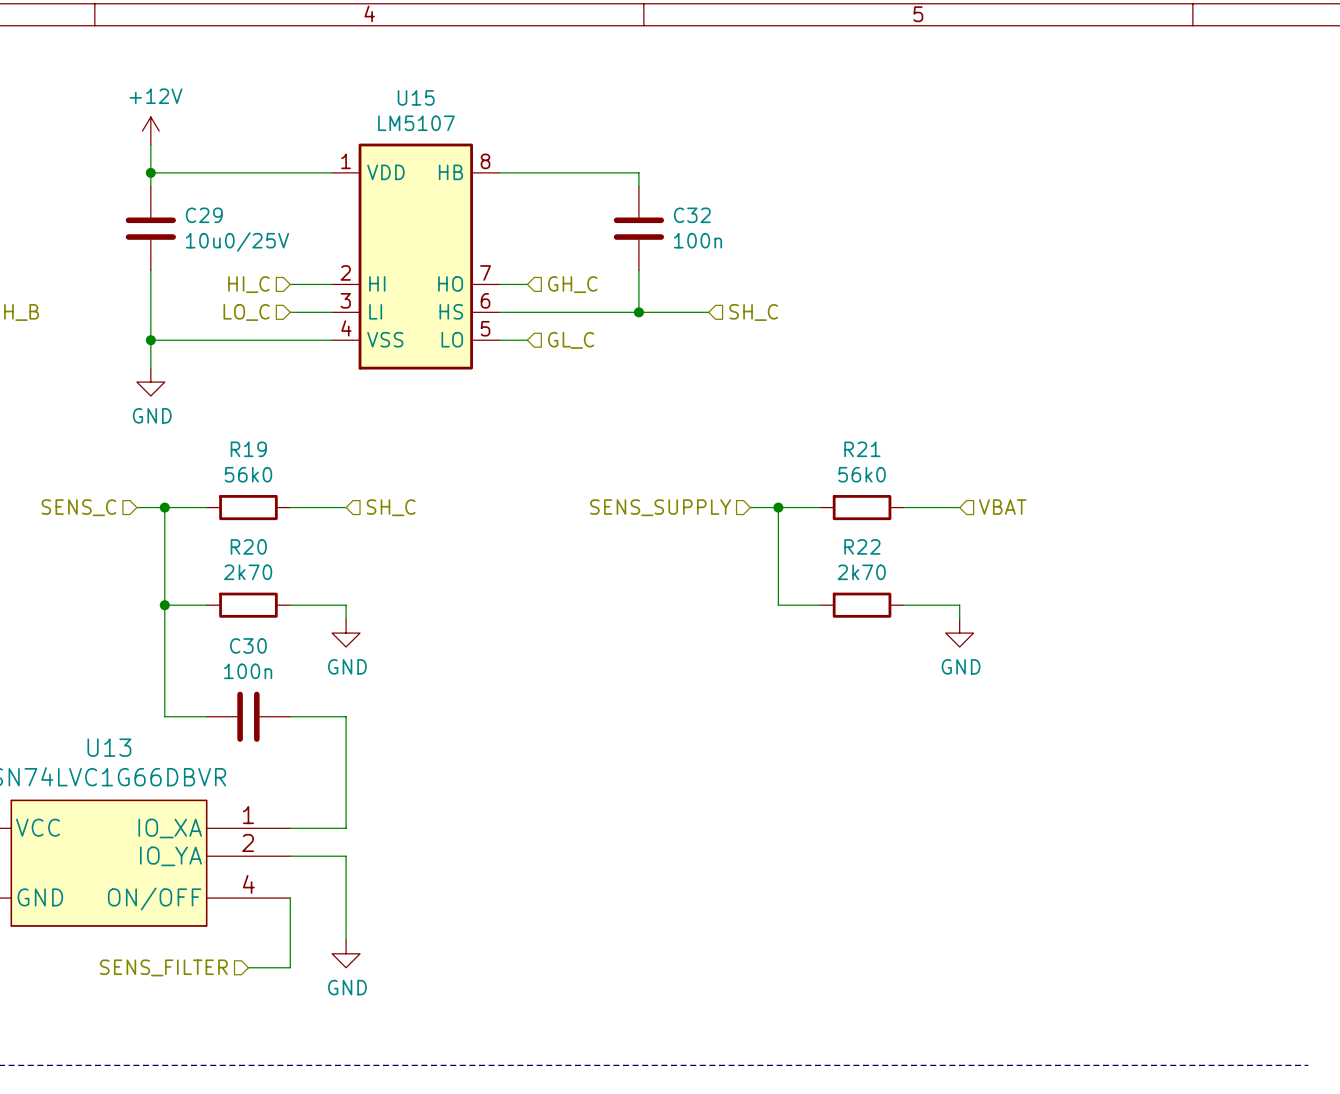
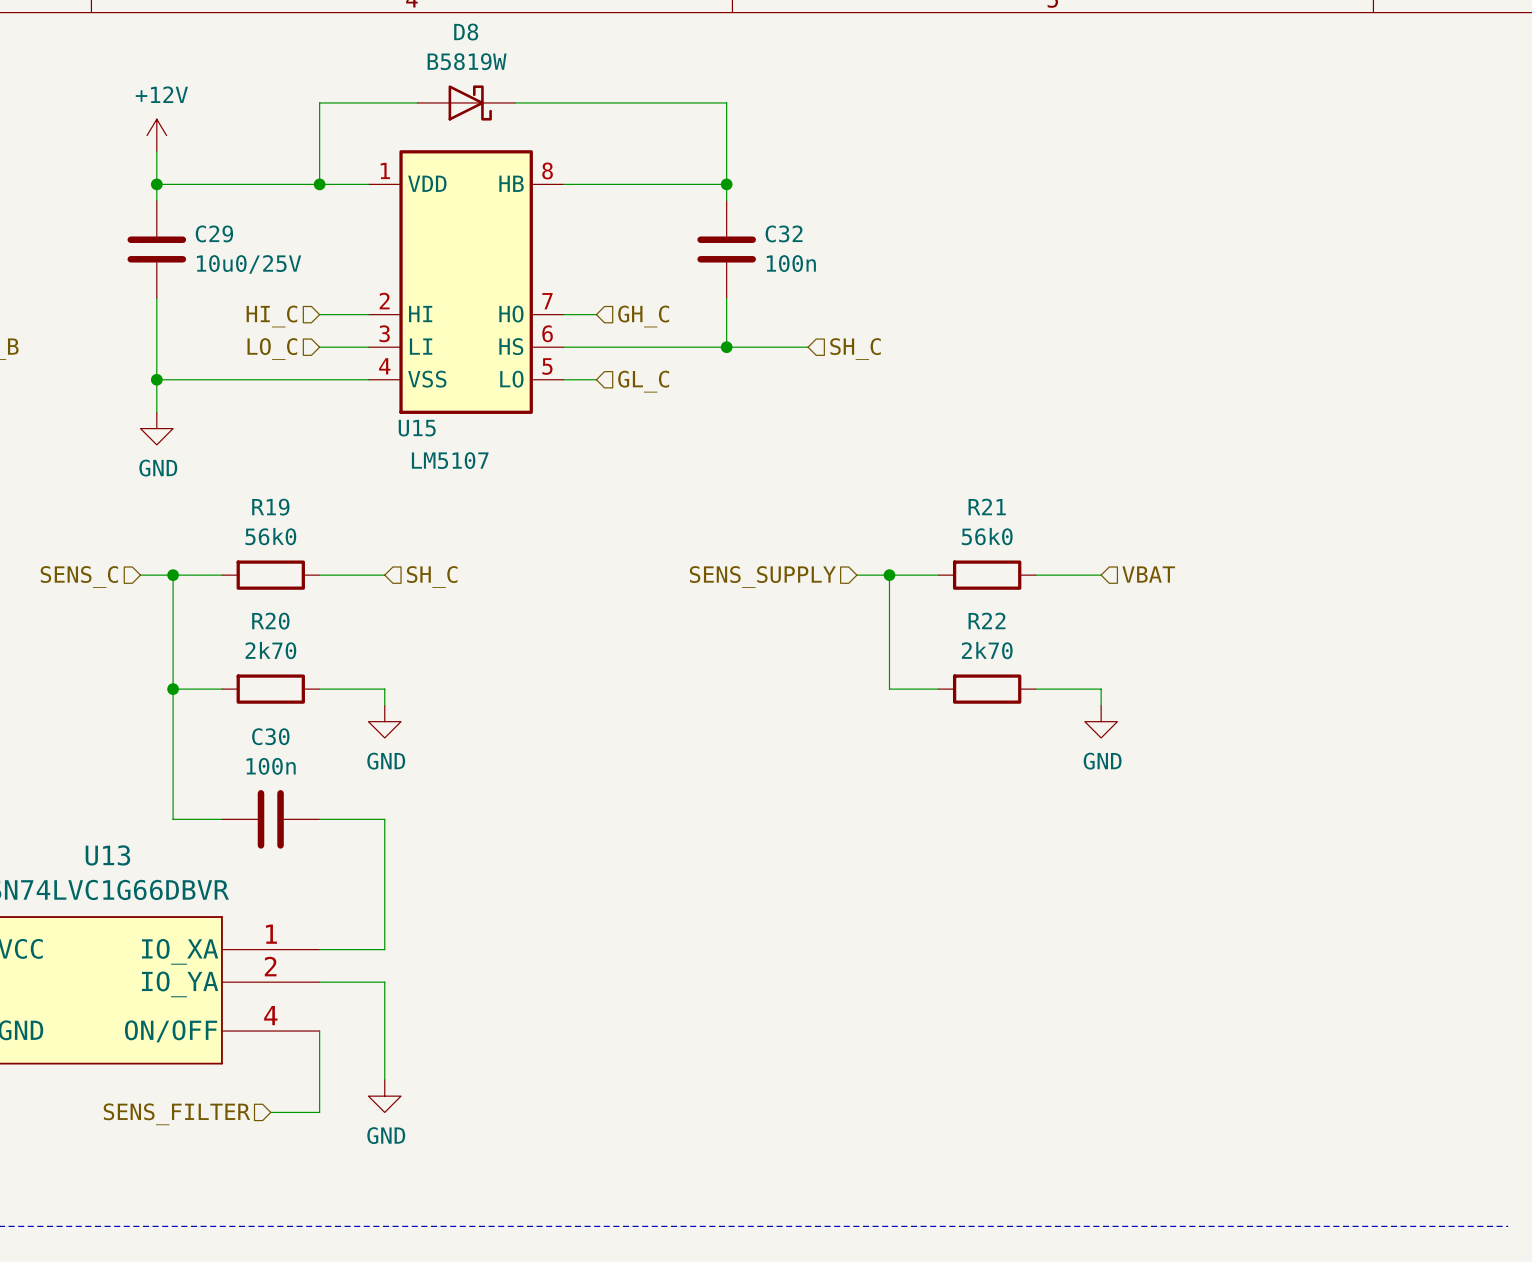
U15 name position: U15 (416, 97) -> U15 (417, 428)
wire: none -> (417, 102) (319, 102) (319, 184)
D8: none -> B5819W (466, 102)
wire: none -> (515, 102) (726, 102) (726, 184)
U15 value position: LM5107 (416, 123) -> LM5107 (450, 460)
junction: none -> (319, 184)
junction: none -> (726, 184)

